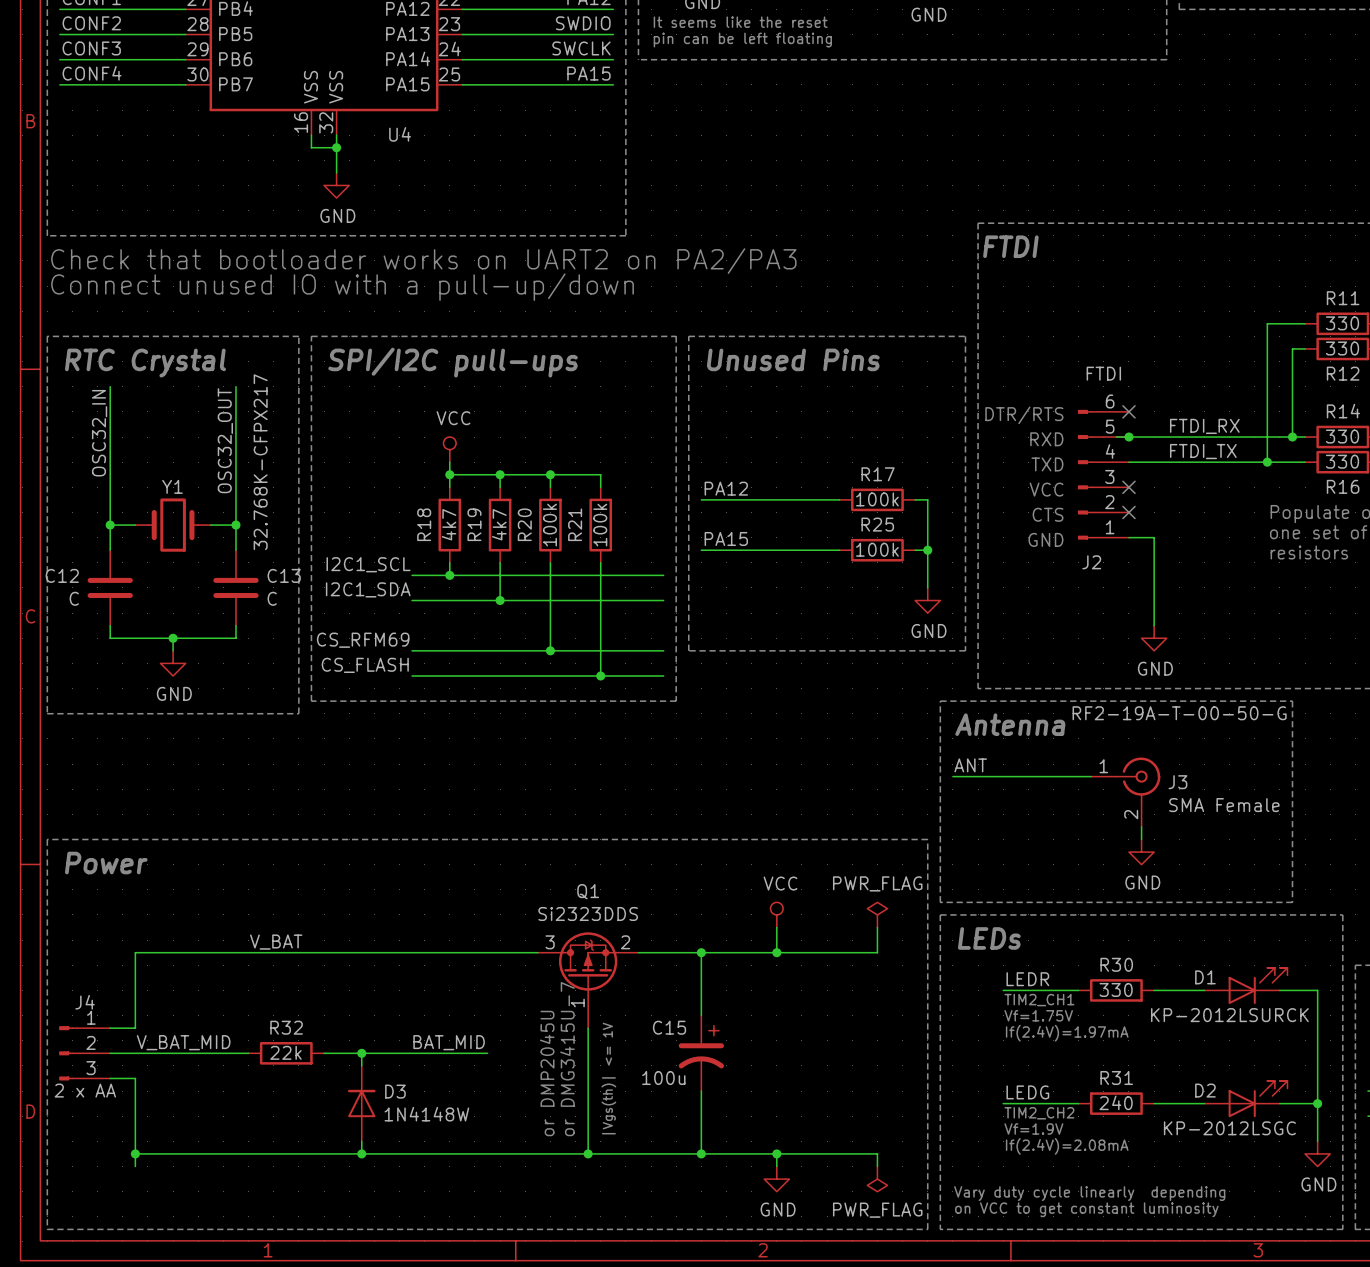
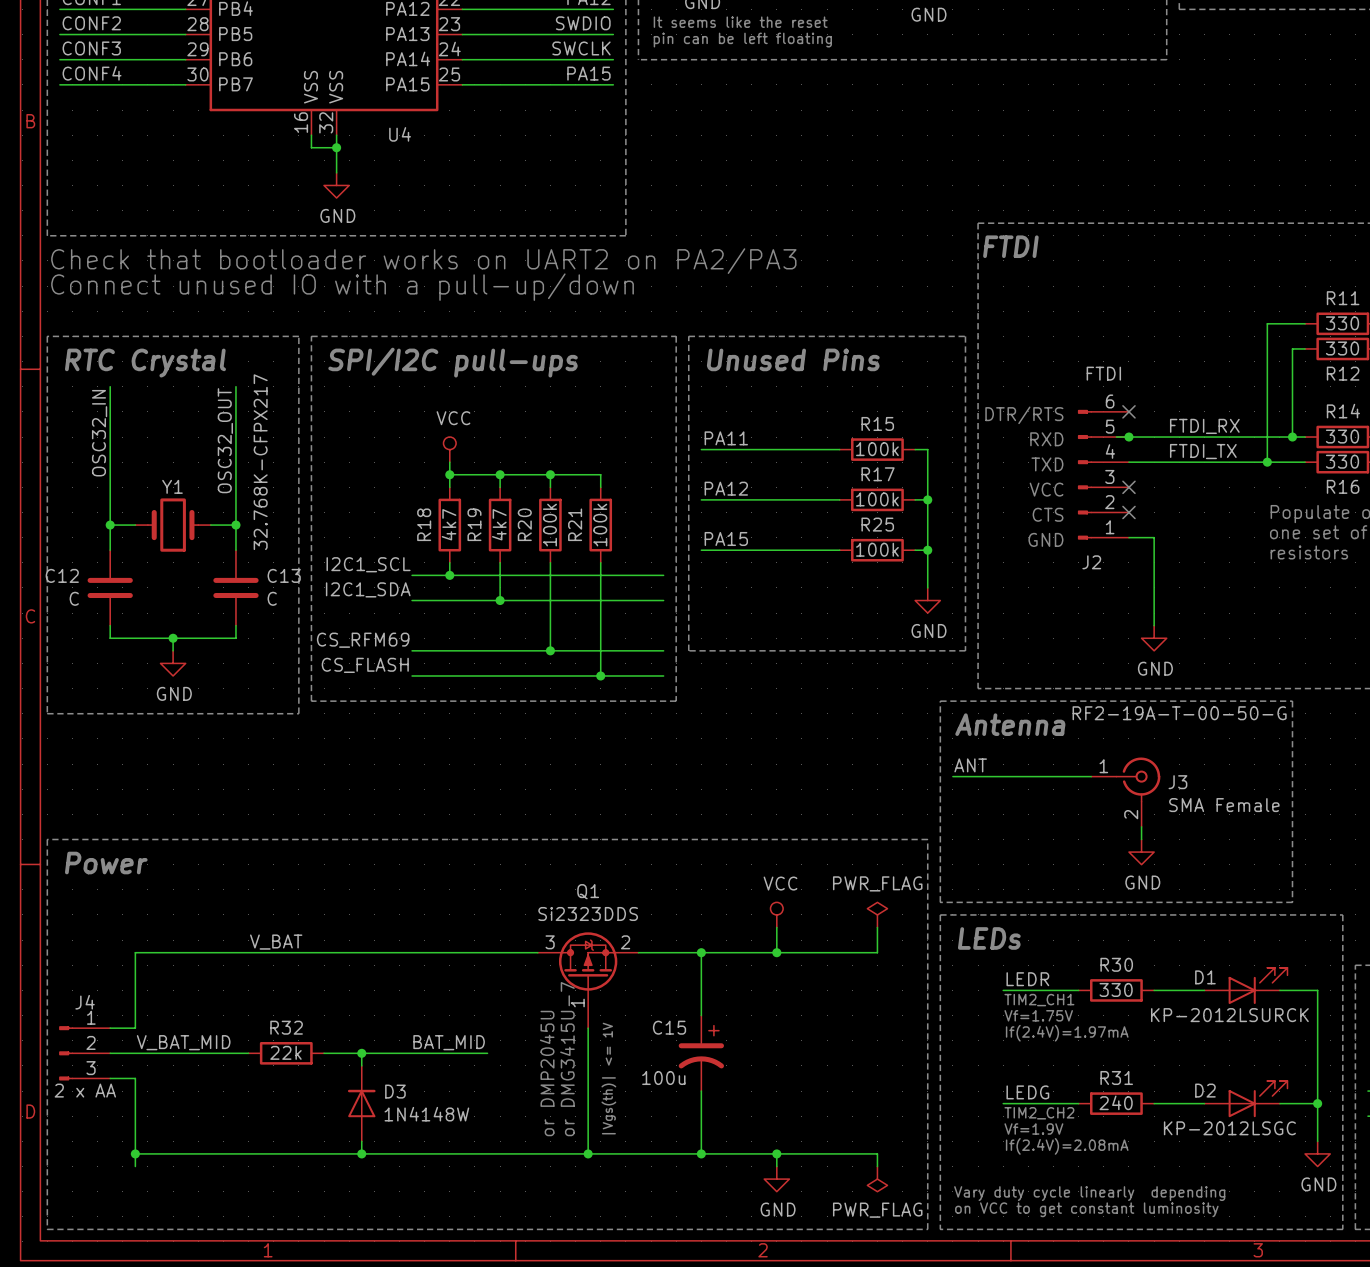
label: none -> PA11 (726, 438)
wire: none -> (701, 449) (839, 449)
R15: none -> 100k (877, 449)
wire: none -> (915, 449) (927, 449) (927, 499)
junction: none -> (927, 499)

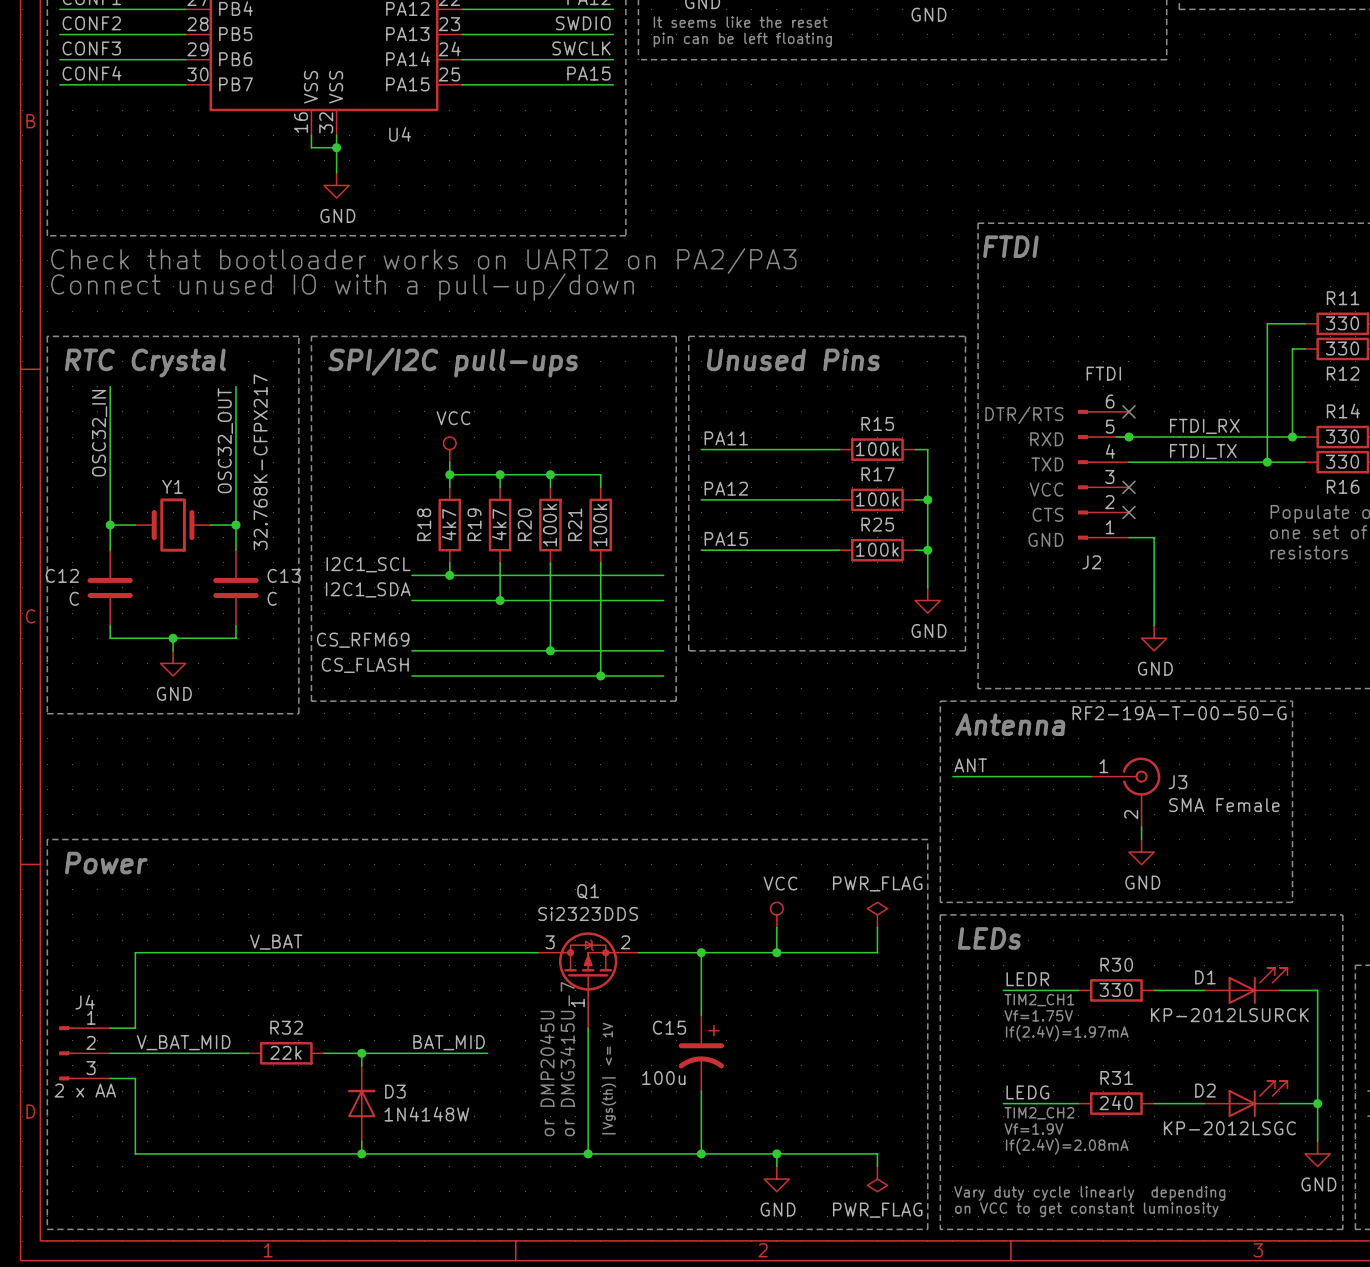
wire: (135, 1153) (135, 1166) -> none
junction: (135, 1153) -> none

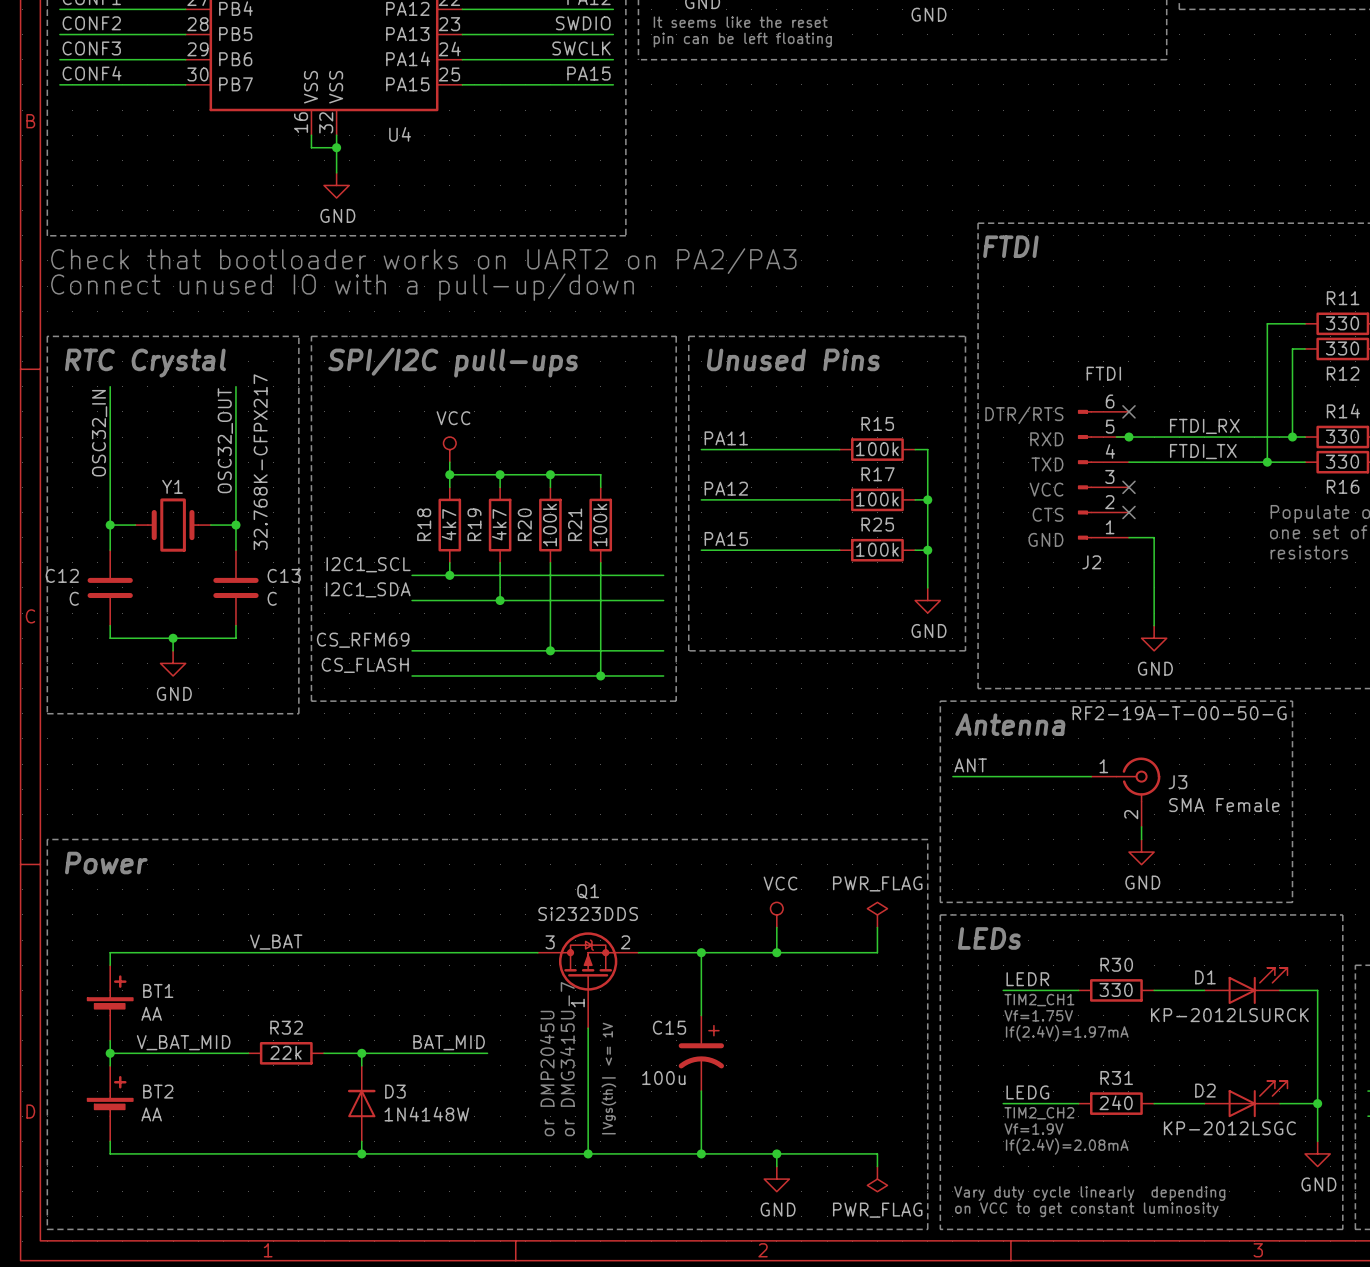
wire: (135, 952) (135, 1028) (110, 1028) -> (135, 952) (110, 952) (110, 965)
BT1: none -> AA (110, 1003)
wire: none -> (110, 1040) (110, 1065)
J4: 2 x AA (84, 1053) -> none
junction: none -> (110, 1053)
wire: (110, 1078) (135, 1078) (135, 1153) -> (110, 1141) (110, 1153) (135, 1153)
BT2: none -> AA (110, 1103)

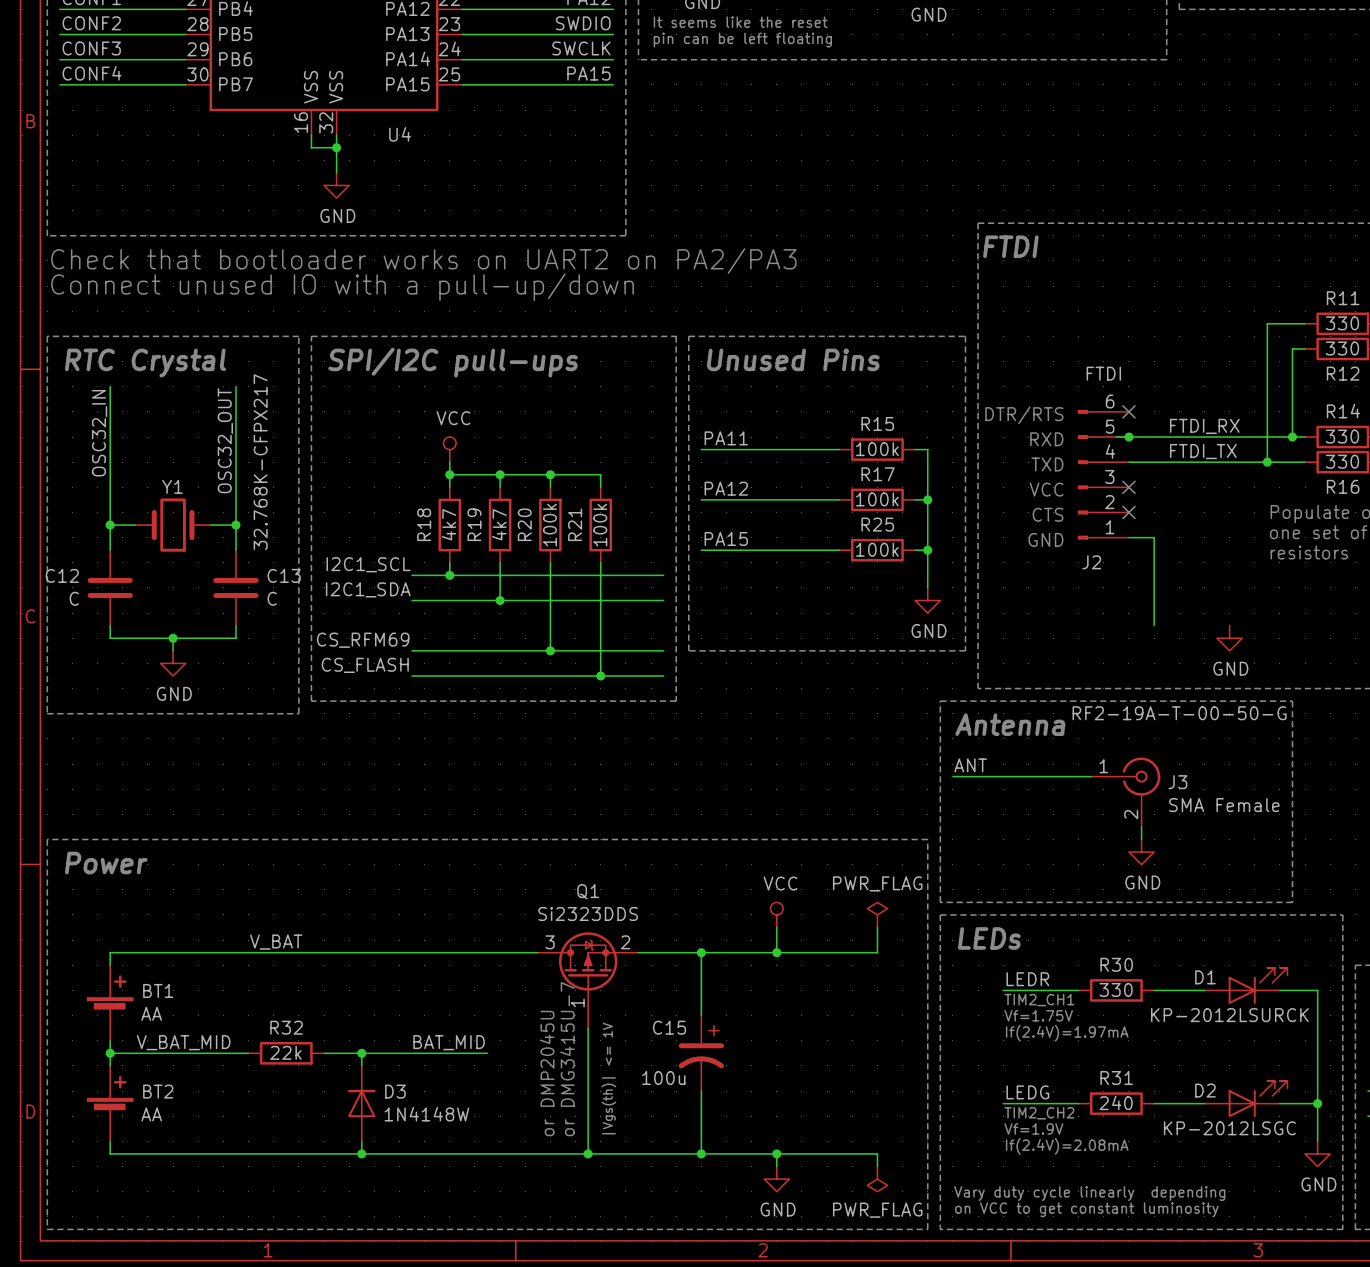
power symbol position: GND (1154, 638) -> GND (1229, 638)

